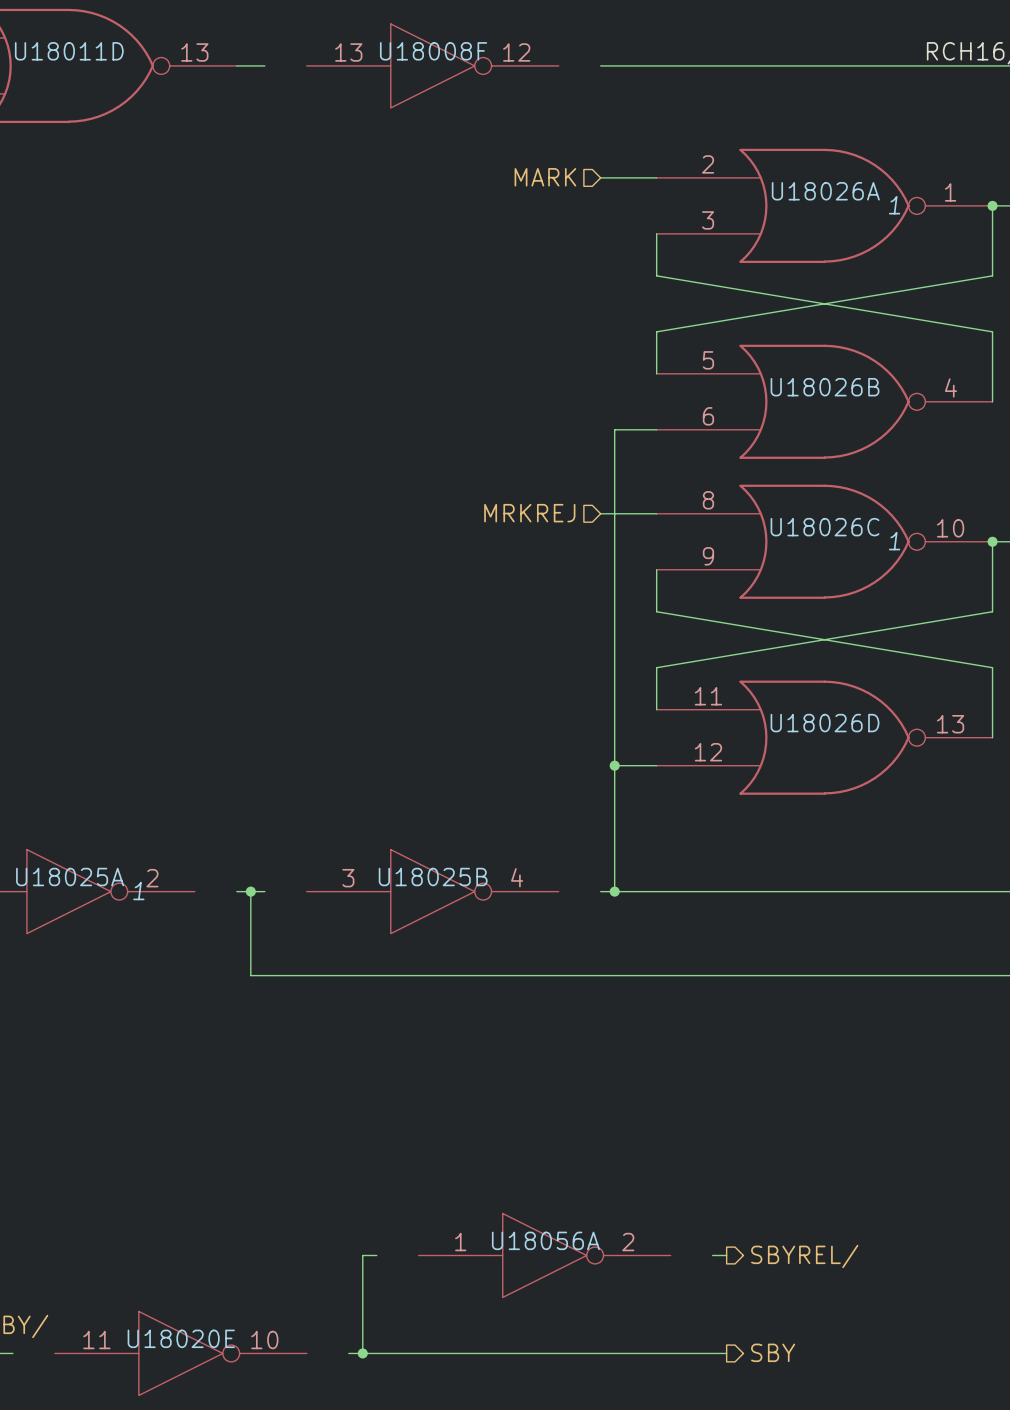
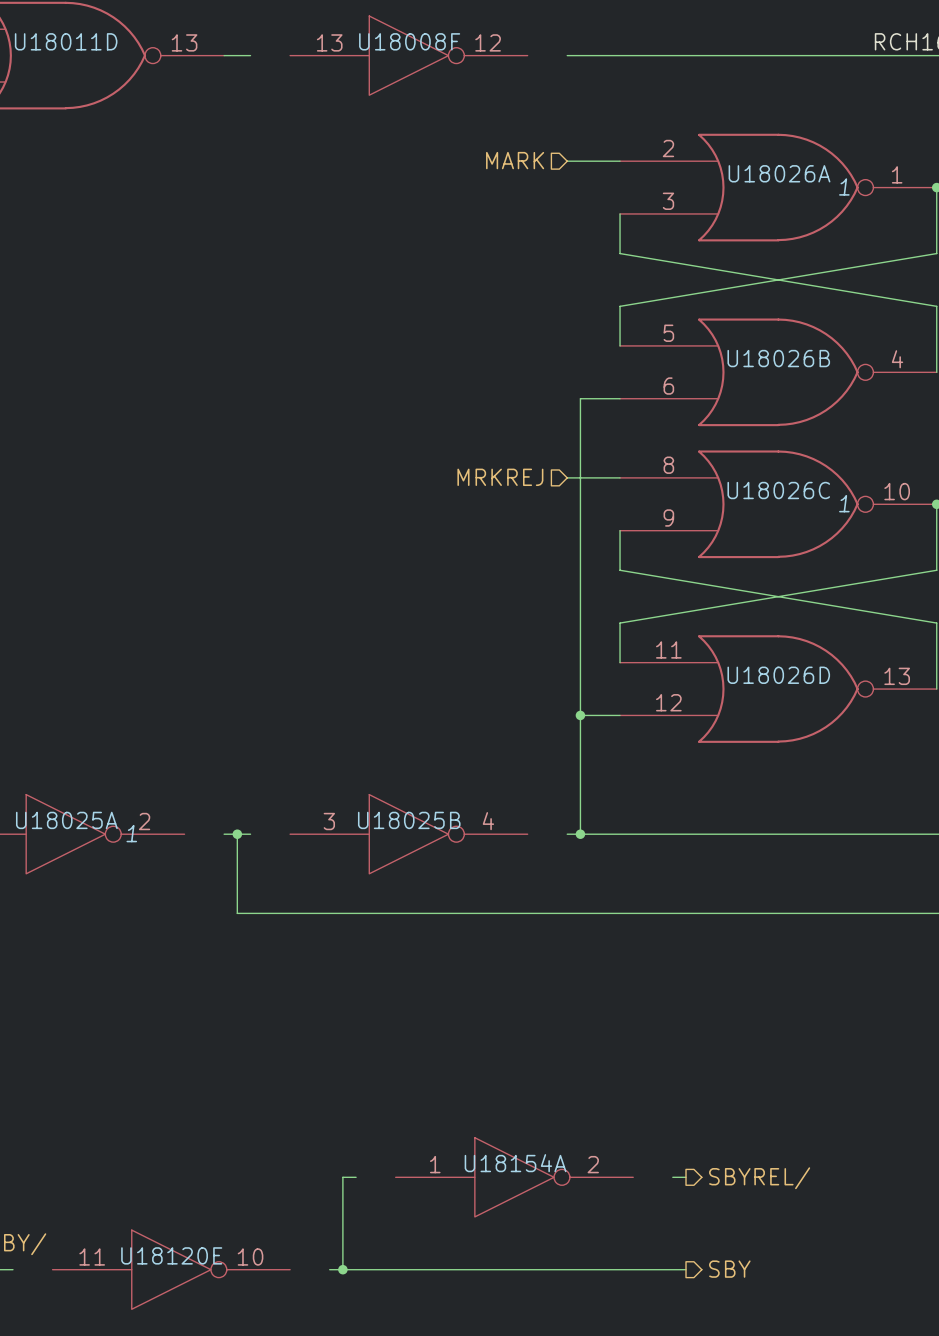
U18056A name: U18056A (545, 1240) -> U18154A (515, 1163)
U18020E name: U18020E (181, 1338) -> U18120E (171, 1255)

